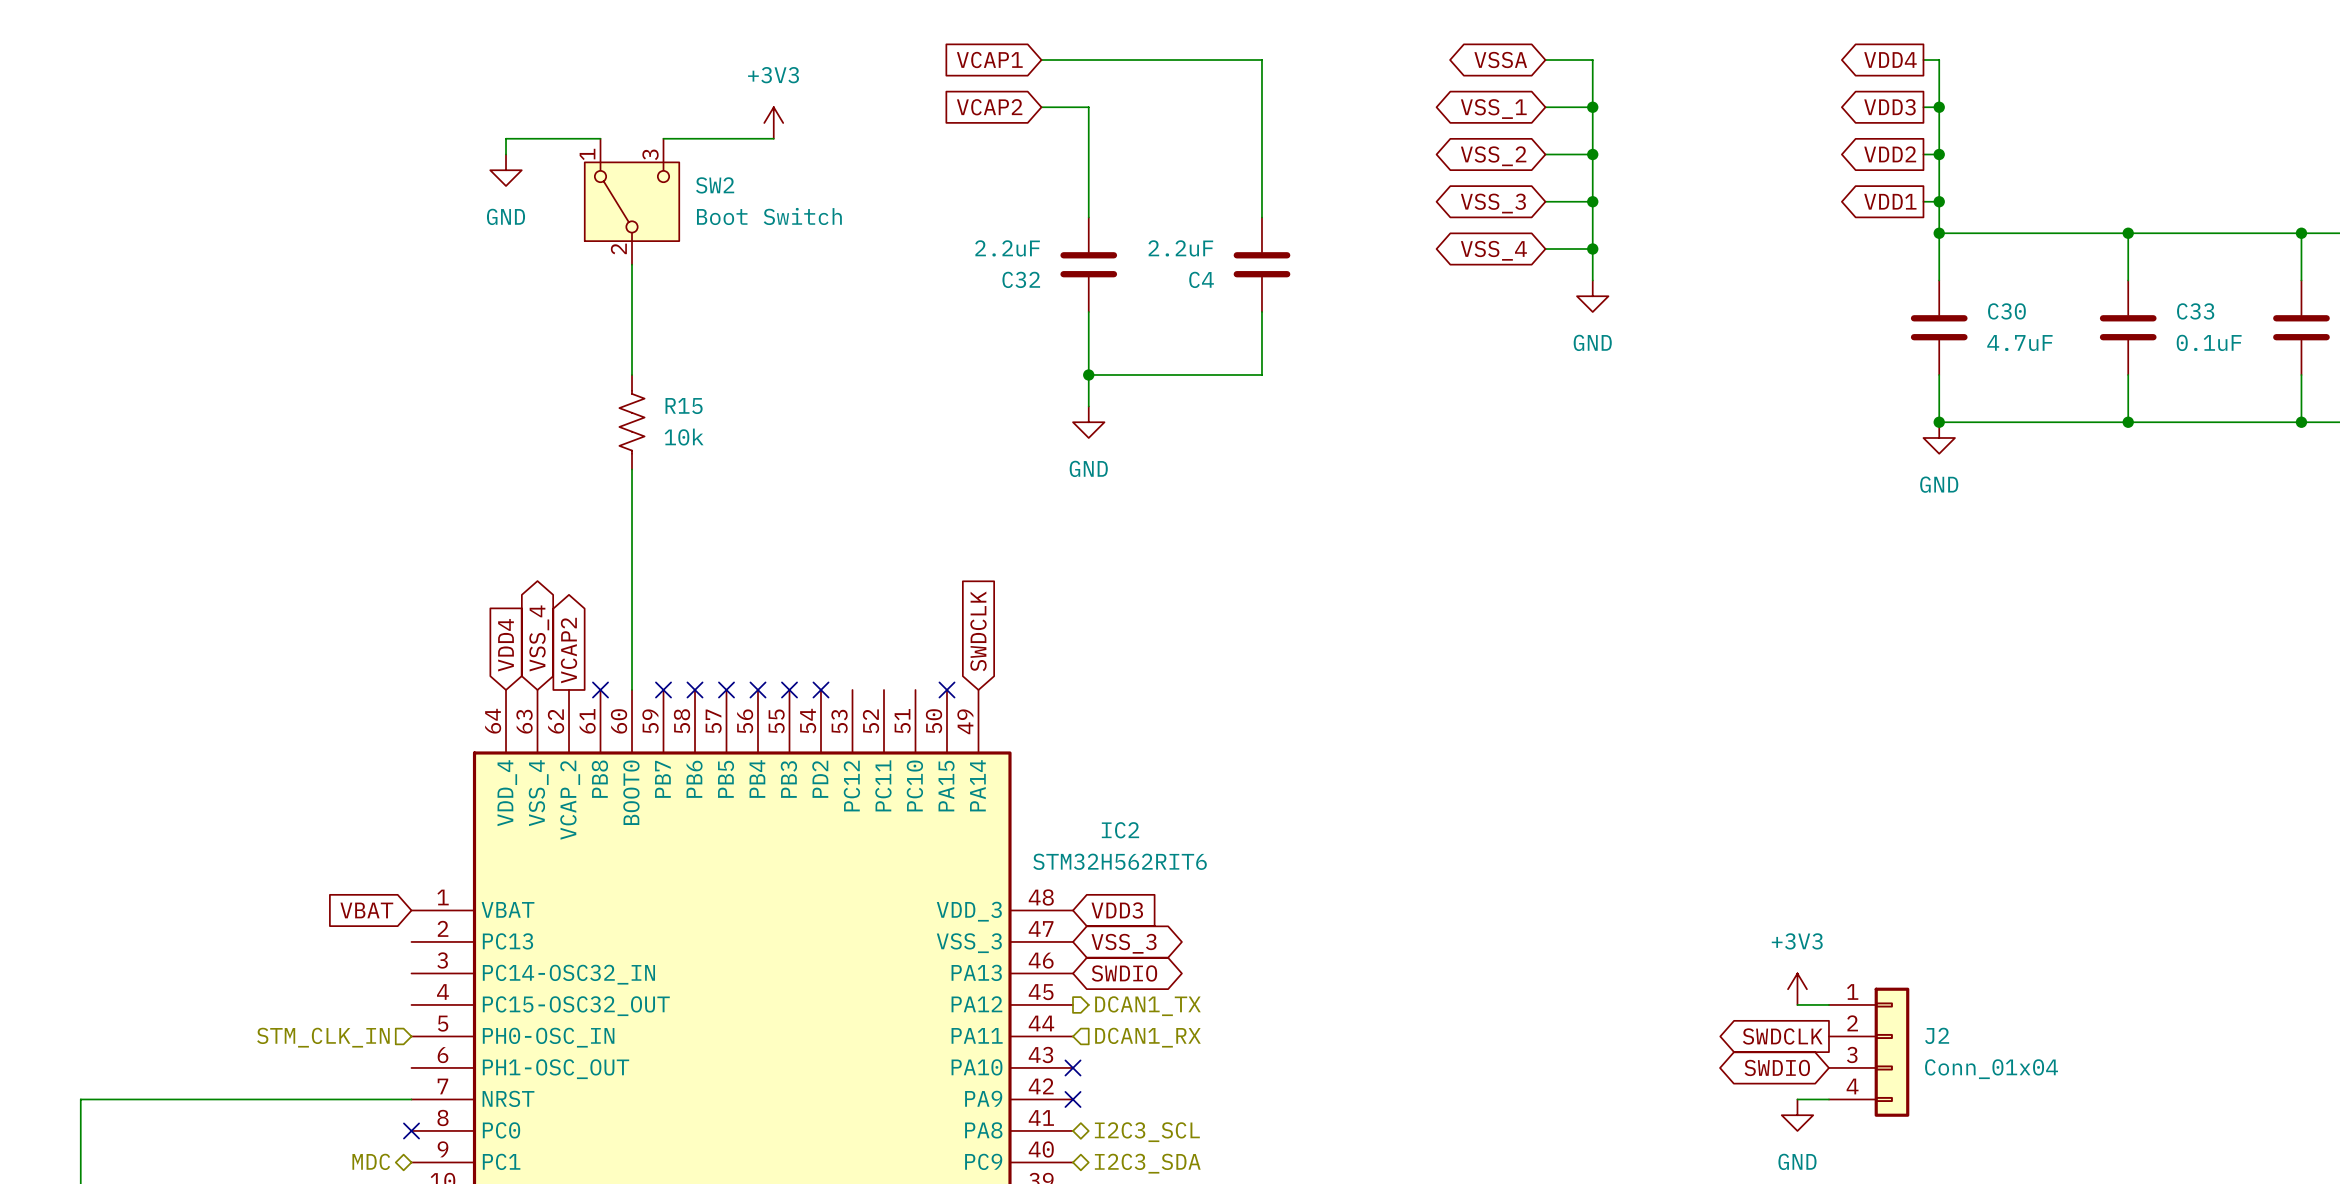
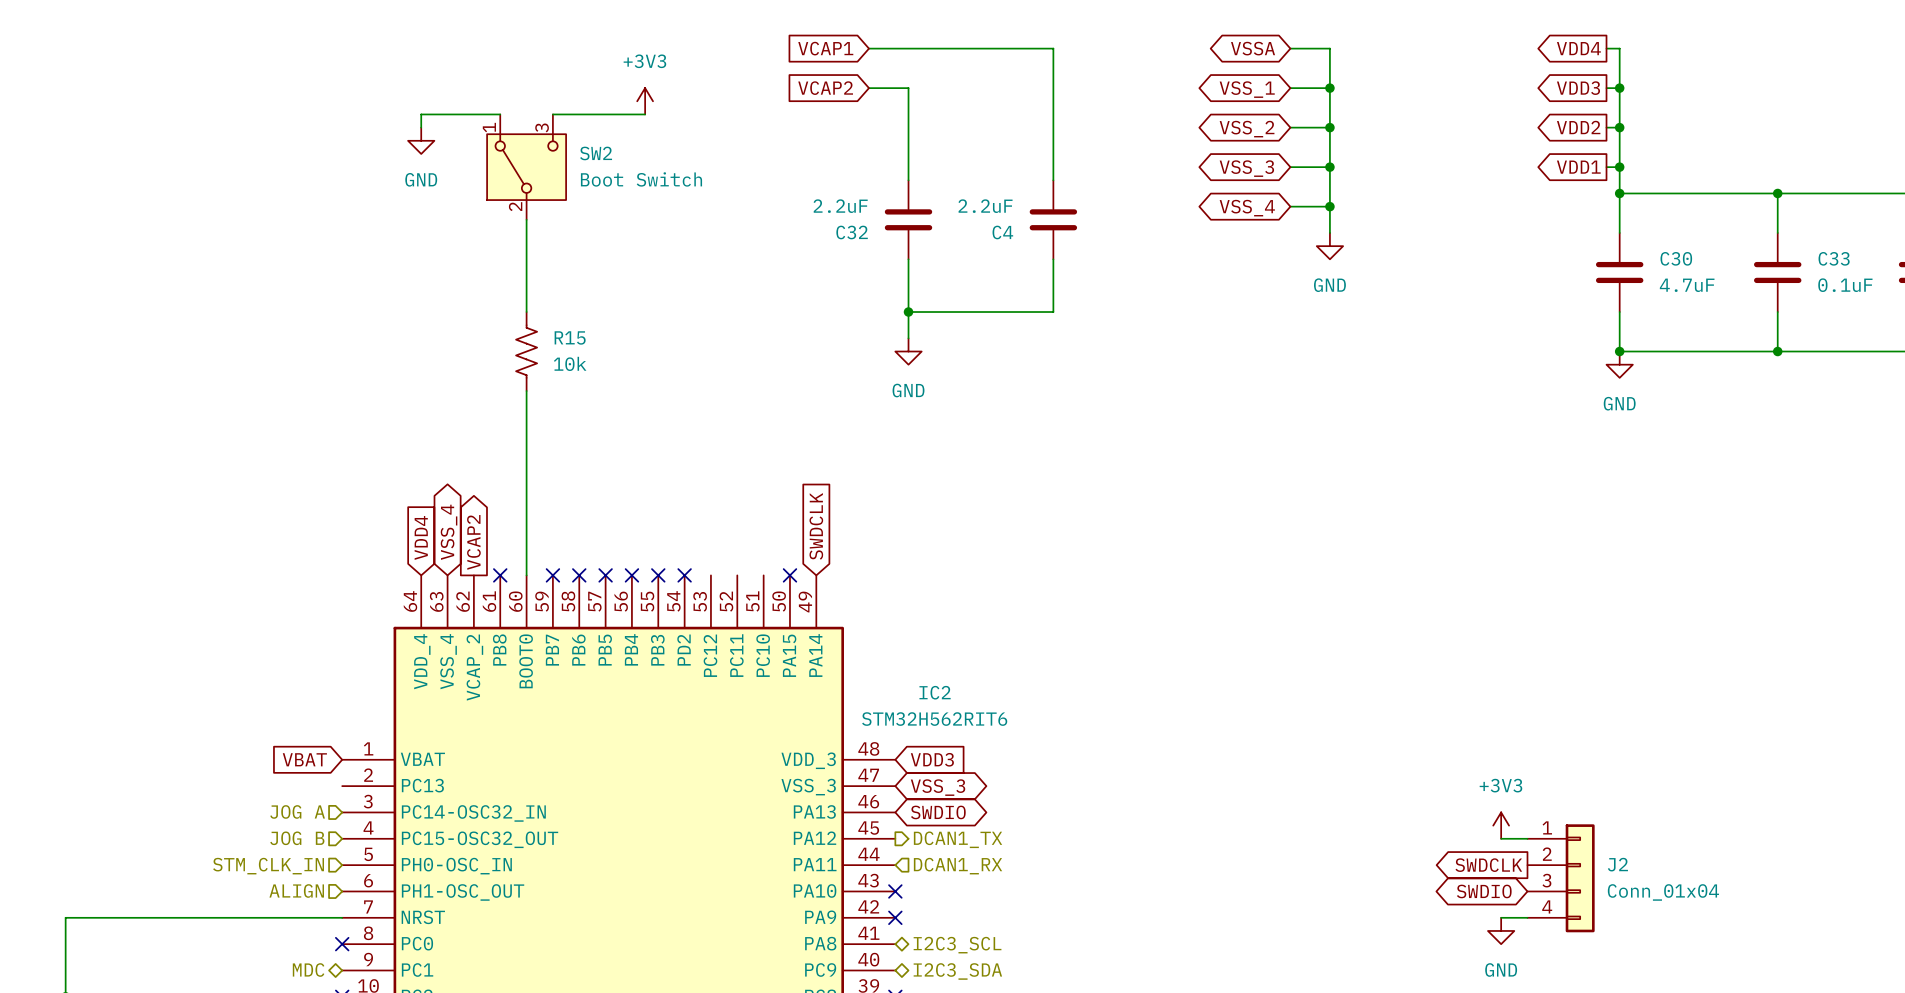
hierarchical label: none -> JOG A (297, 811)
hierarchical label: none -> JOG B (297, 838)
hierarchical label: none -> ALIGN (296, 890)

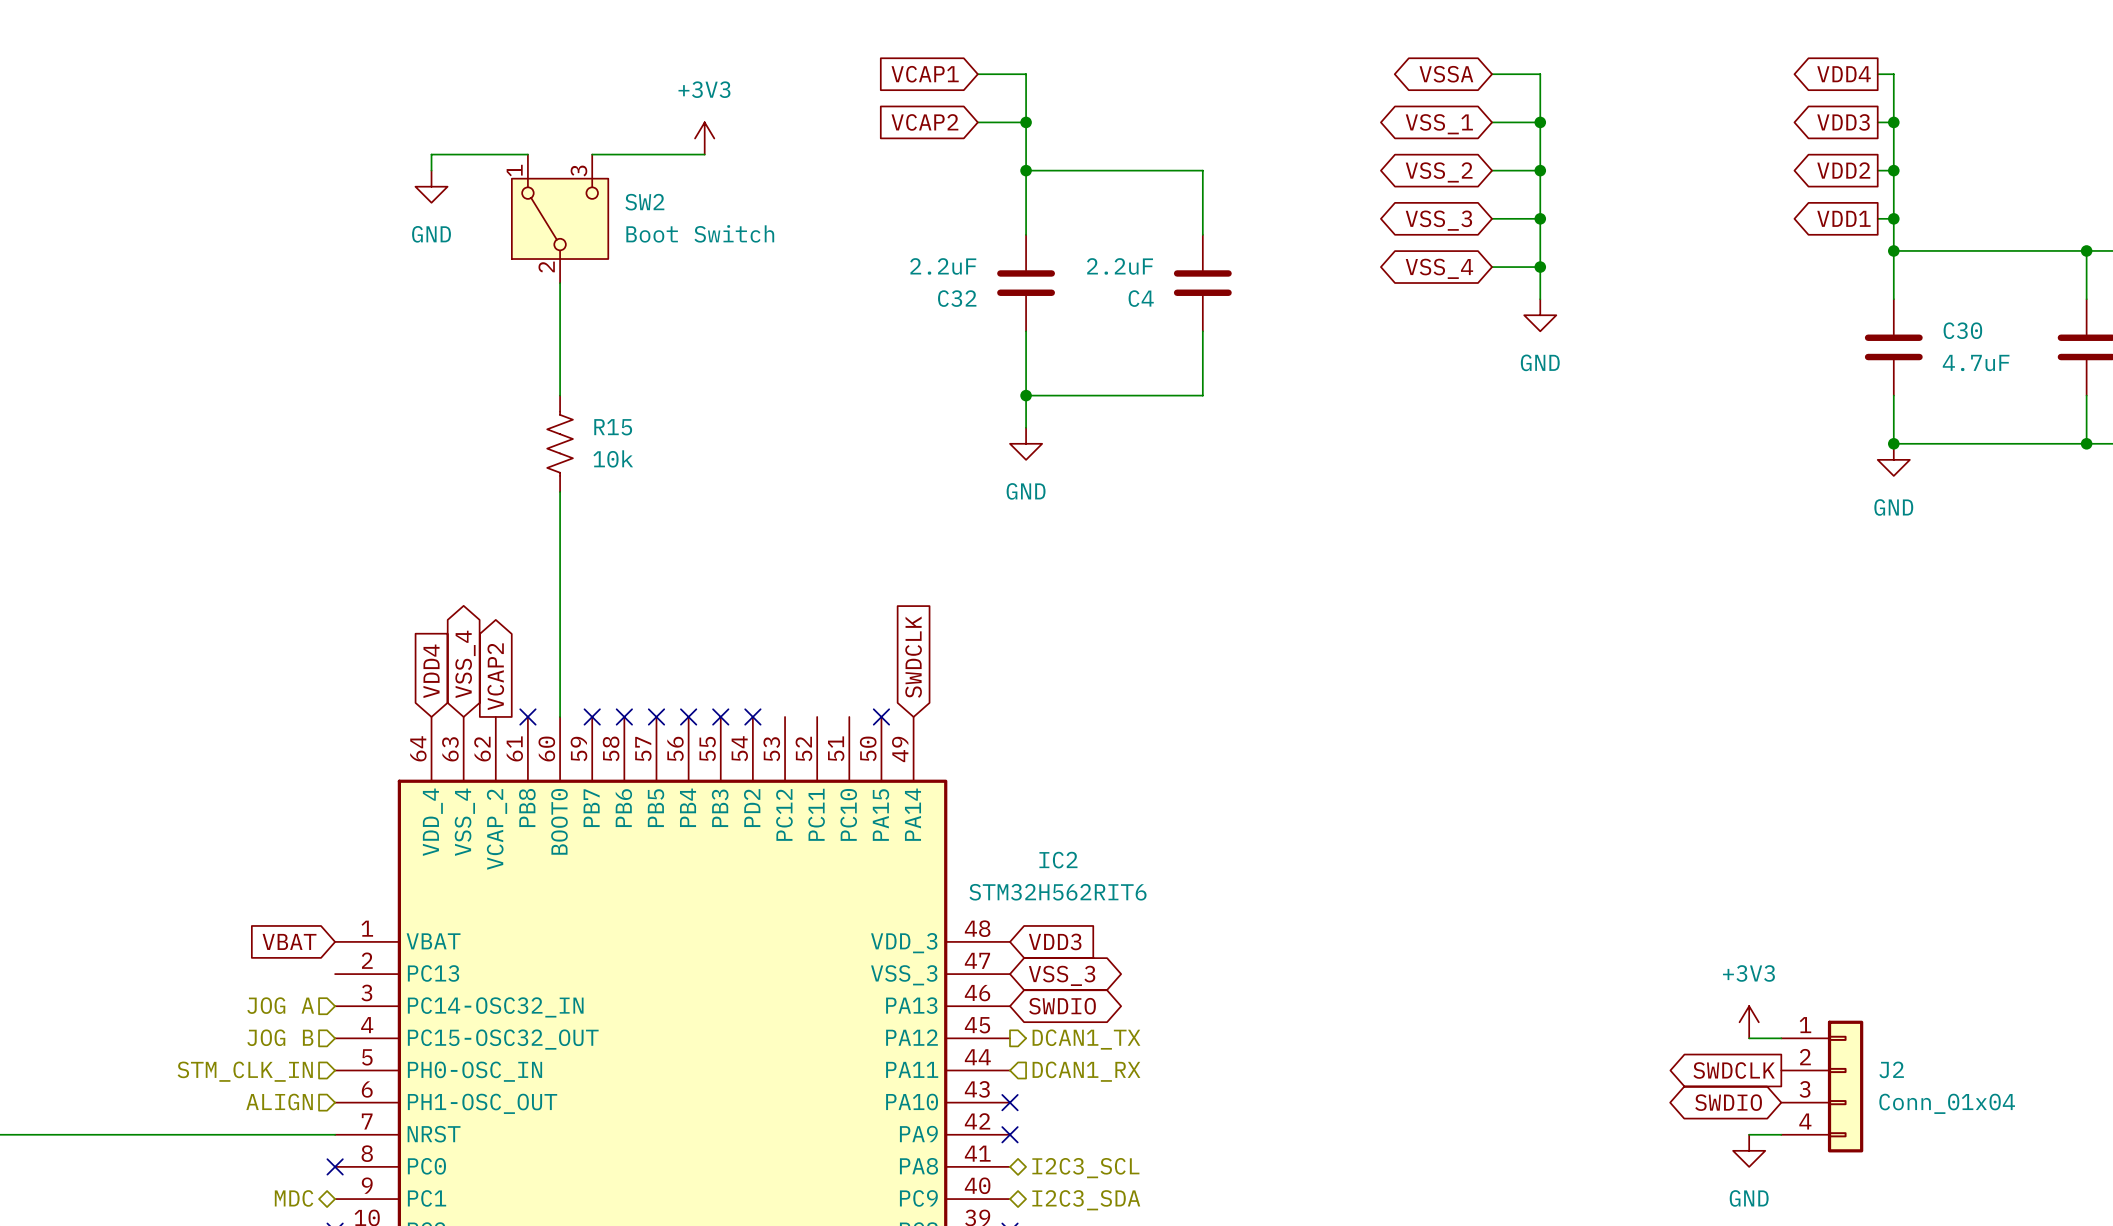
wire: (908, 48) (1053, 48) (1053, 127) -> (1026, 170) (1202, 170)
wire: none -> (1026, 74) (1026, 122)
junction: none -> (1026, 122)
junction: none -> (1026, 170)

